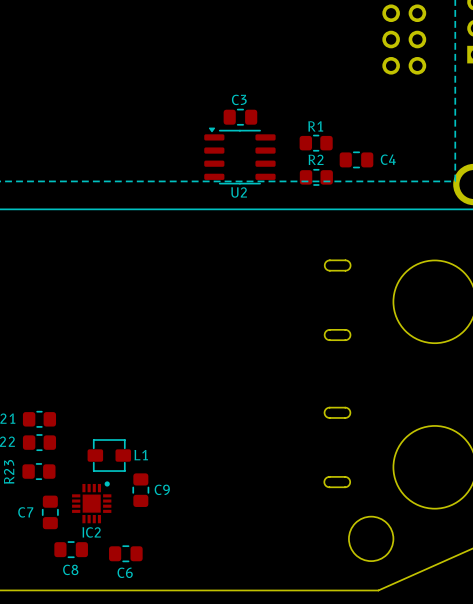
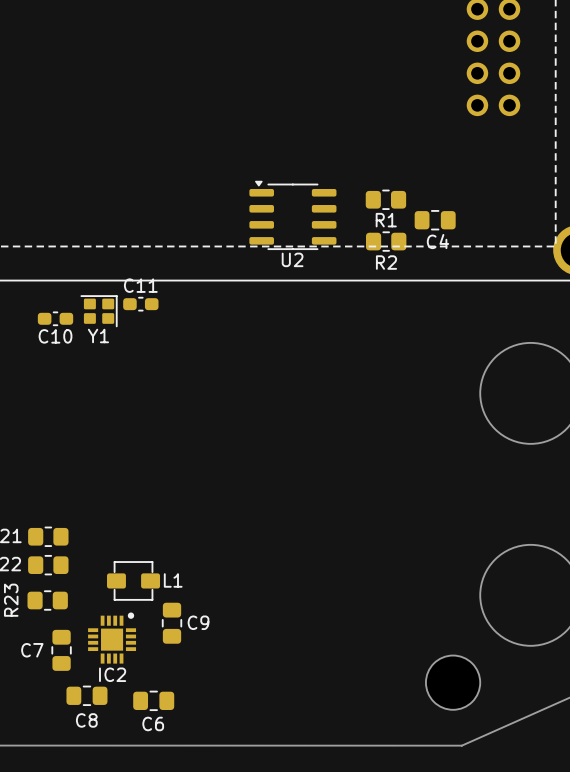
C3: (240, 117) -> none
R1 name position: R1 (315, 126) -> R1 (386, 220)
R2 name position: R2 (316, 159) -> R2 (386, 262)
C4 name position: C4 (388, 159) -> C4 (437, 241)
C11: none -> (140, 304)
Y1: none -> (99, 311)
C10: none -> (55, 318)
board edge: (329, 260) (346, 260) (349, 262) (350, 266) (346, 270) (328, 270) (324, 264) (329, 260) -> none
board edge: (329, 329) (347, 330) (350, 333) (350, 336) (345, 340) (327, 339) (324, 333) (329, 329) -> none
board edge: (329, 407) (347, 407) (350, 410) (350, 414) (345, 417) (327, 417) (324, 412) (329, 407) -> none
board edge: (329, 476) (346, 477) (349, 480) (349, 483) (345, 487) (327, 486) (324, 481) (329, 476) -> none

